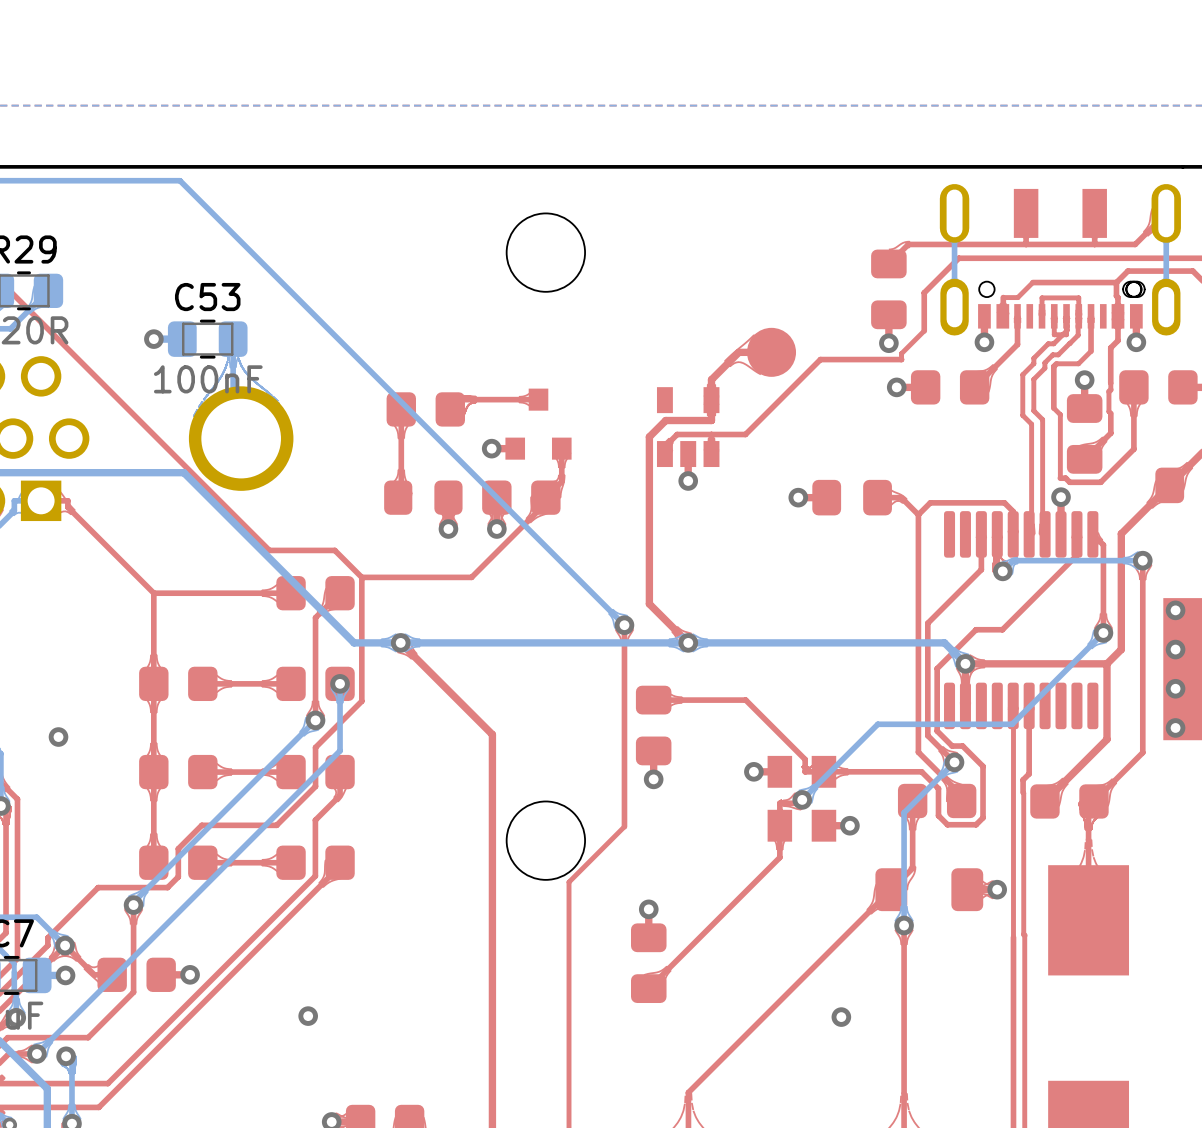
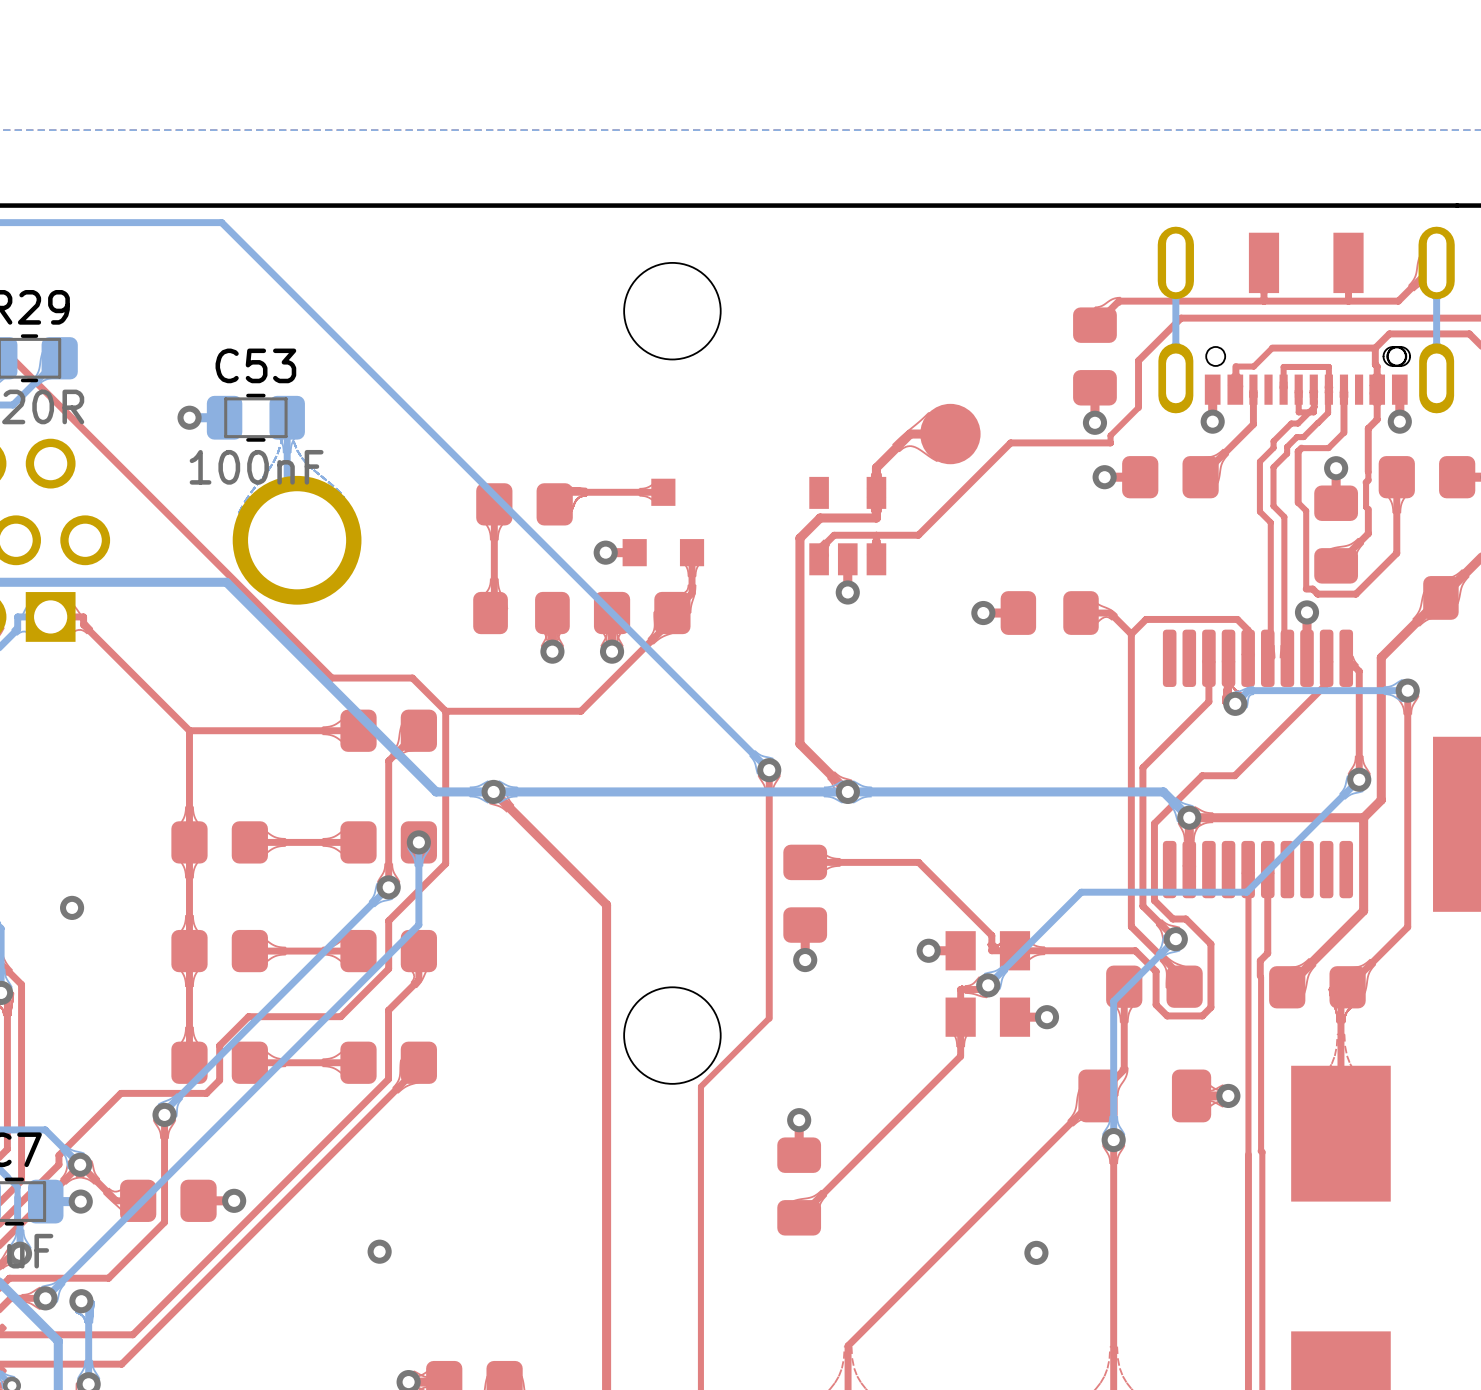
via: (1175, 610) -> none
via: (1175, 649) -> none
via: (1175, 688) -> none
via: (1175, 727) -> none

